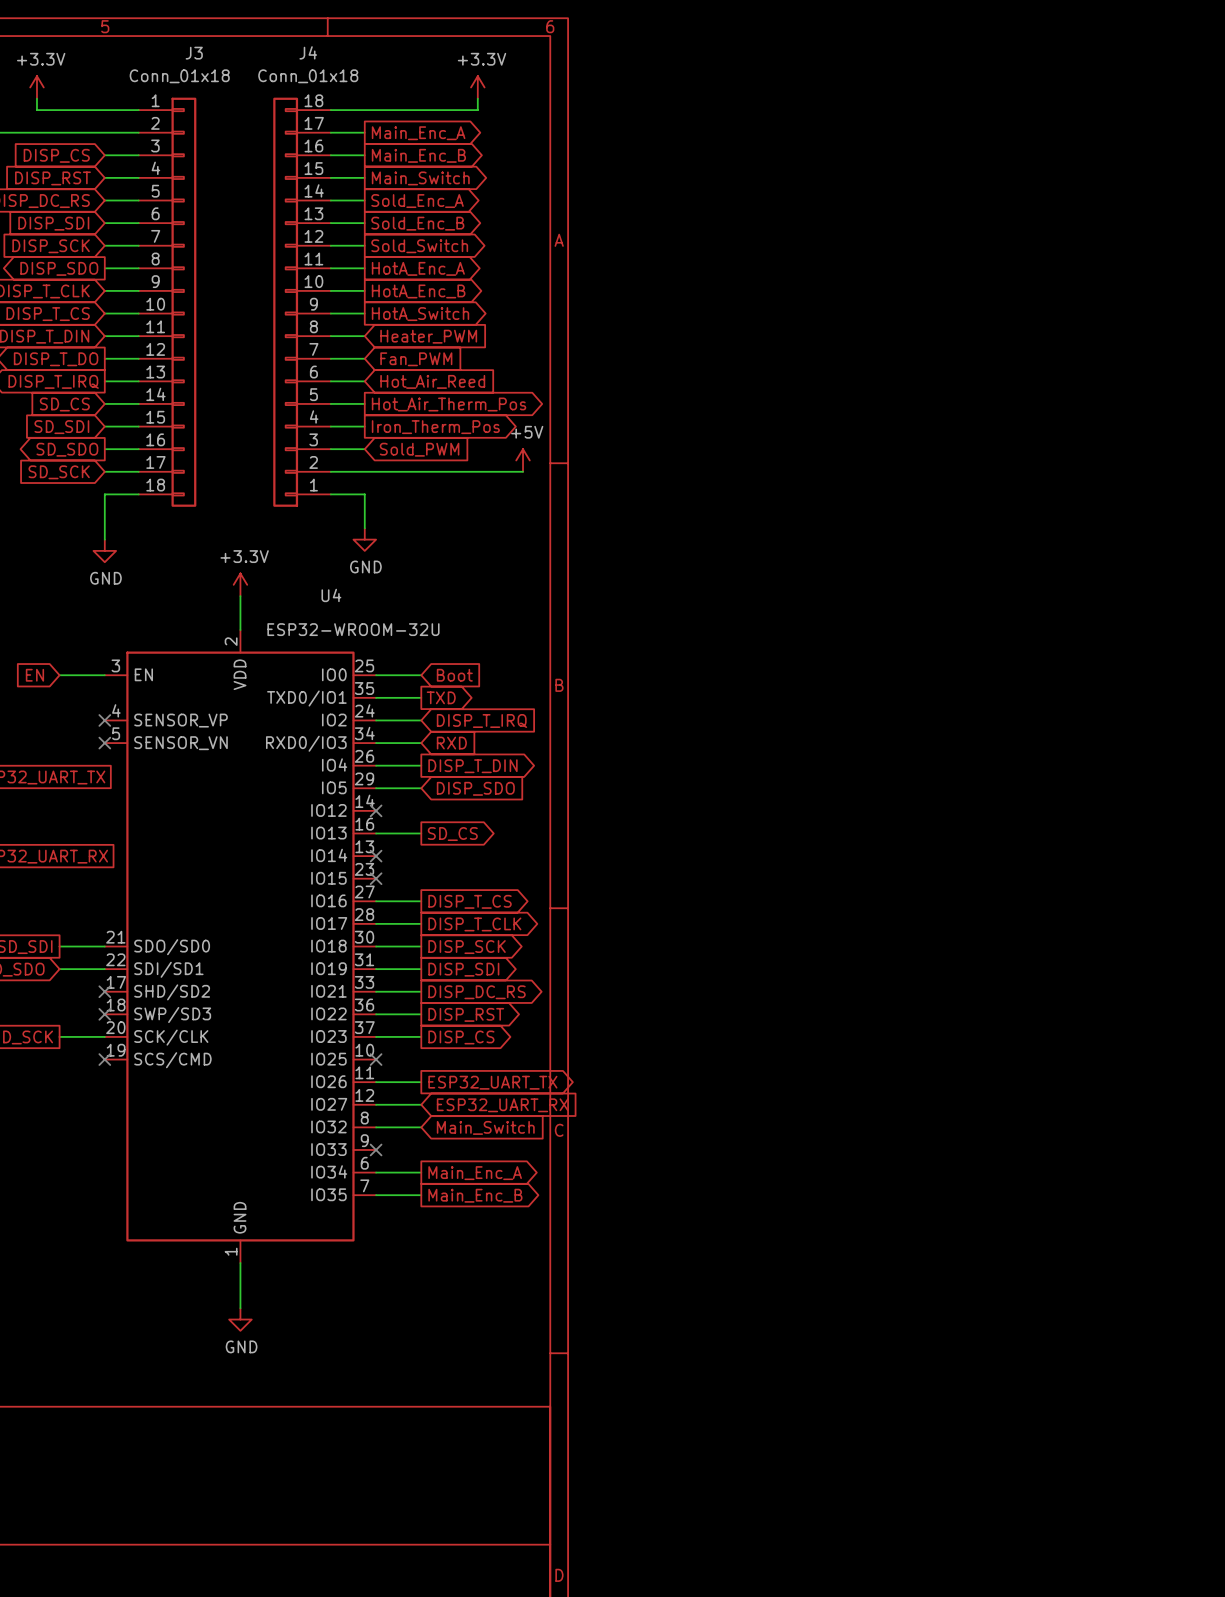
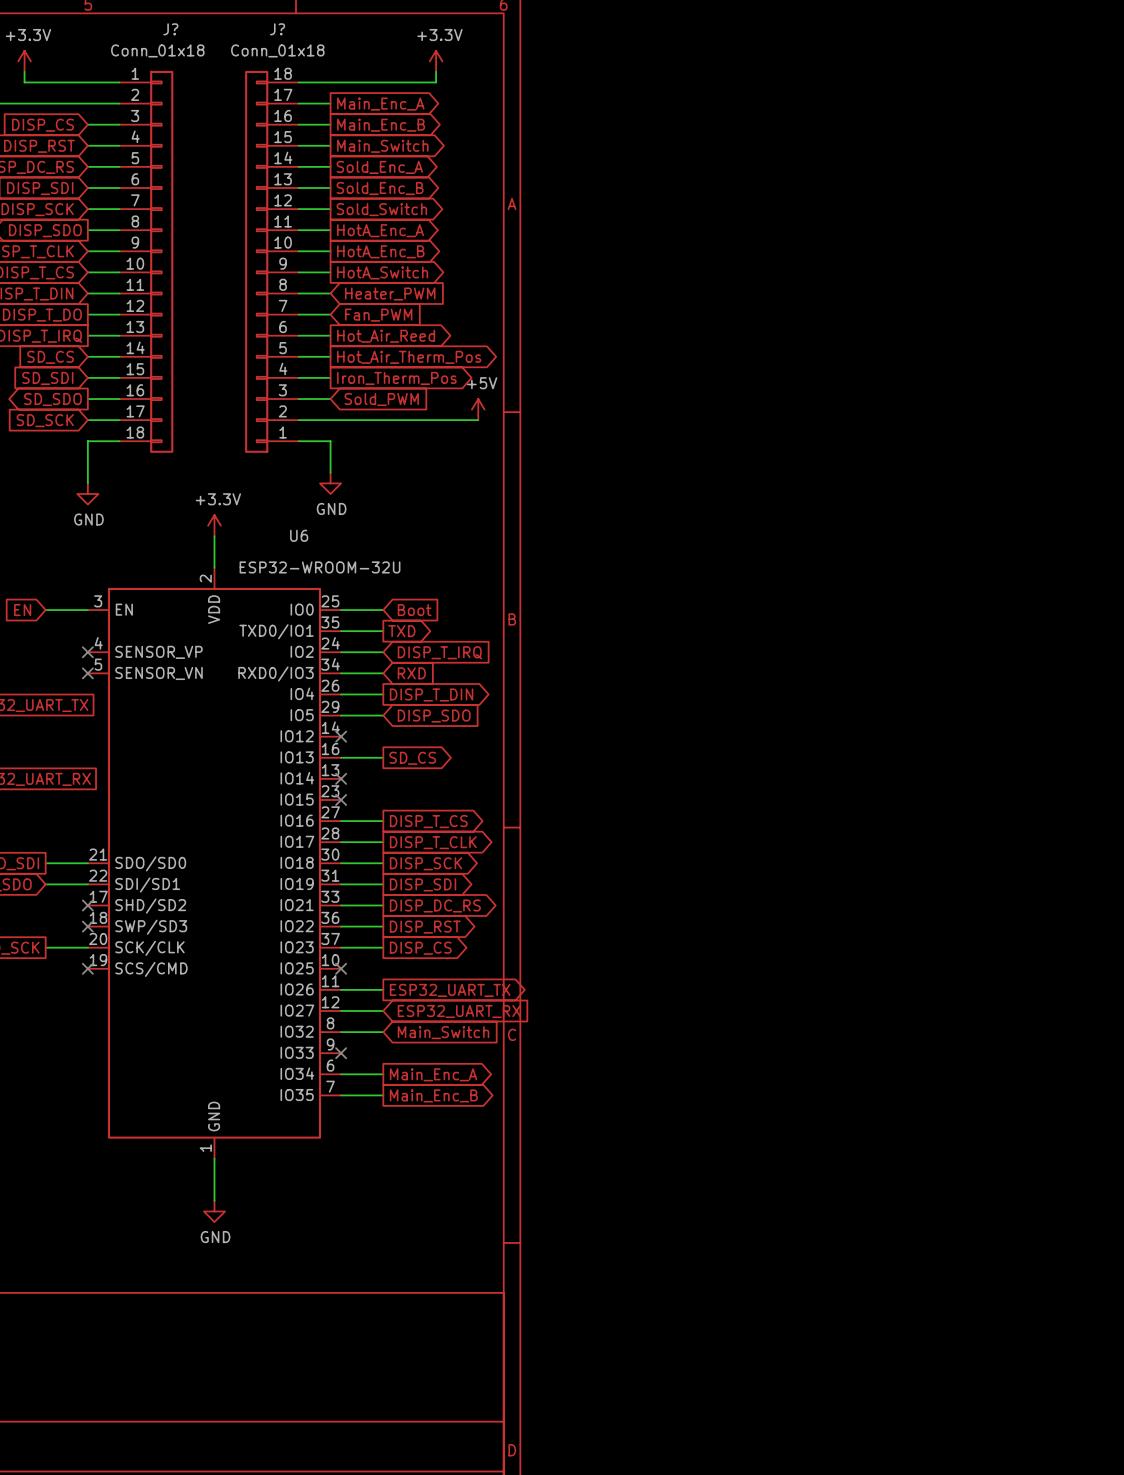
J4 name: J4 (308, 52) -> J? (277, 29)
J3 name: J3 (194, 53) -> J? (170, 29)
global label shape: input (432, 381) -> output (386, 336)
U4 name: U4 (331, 595) -> U6 (299, 535)

